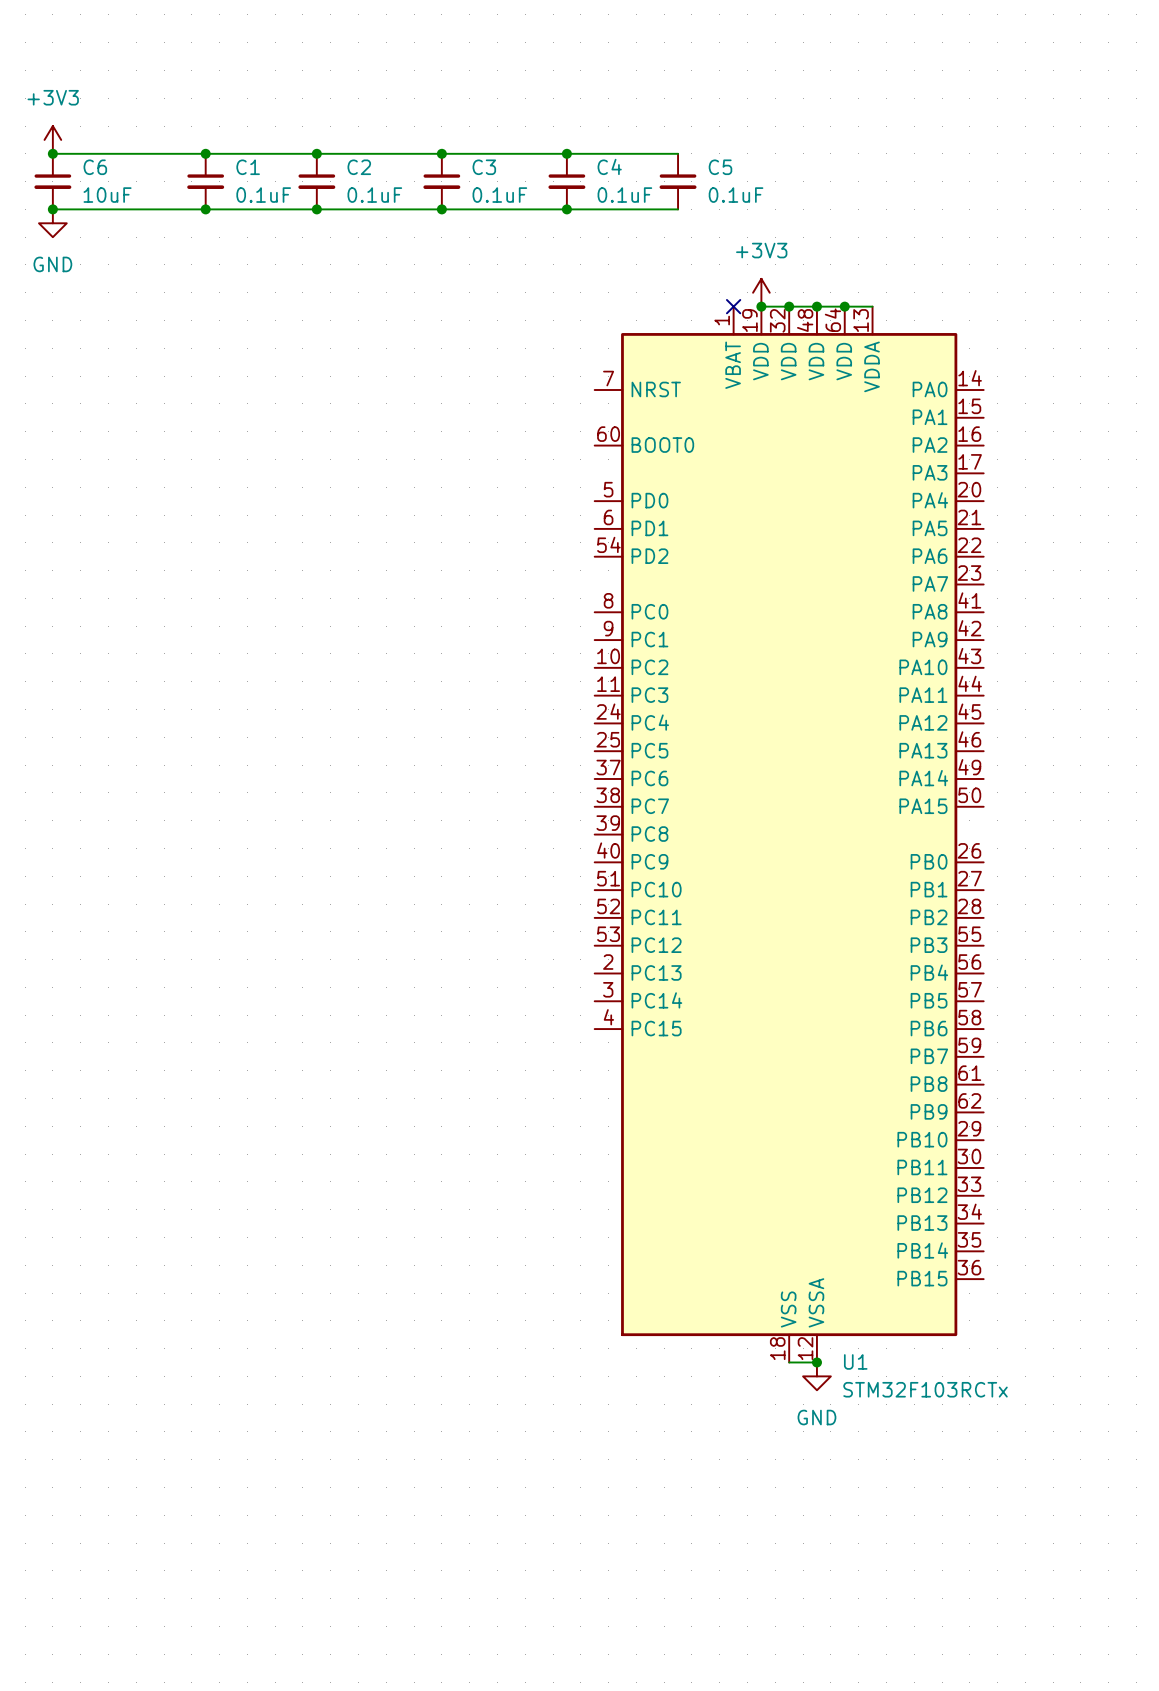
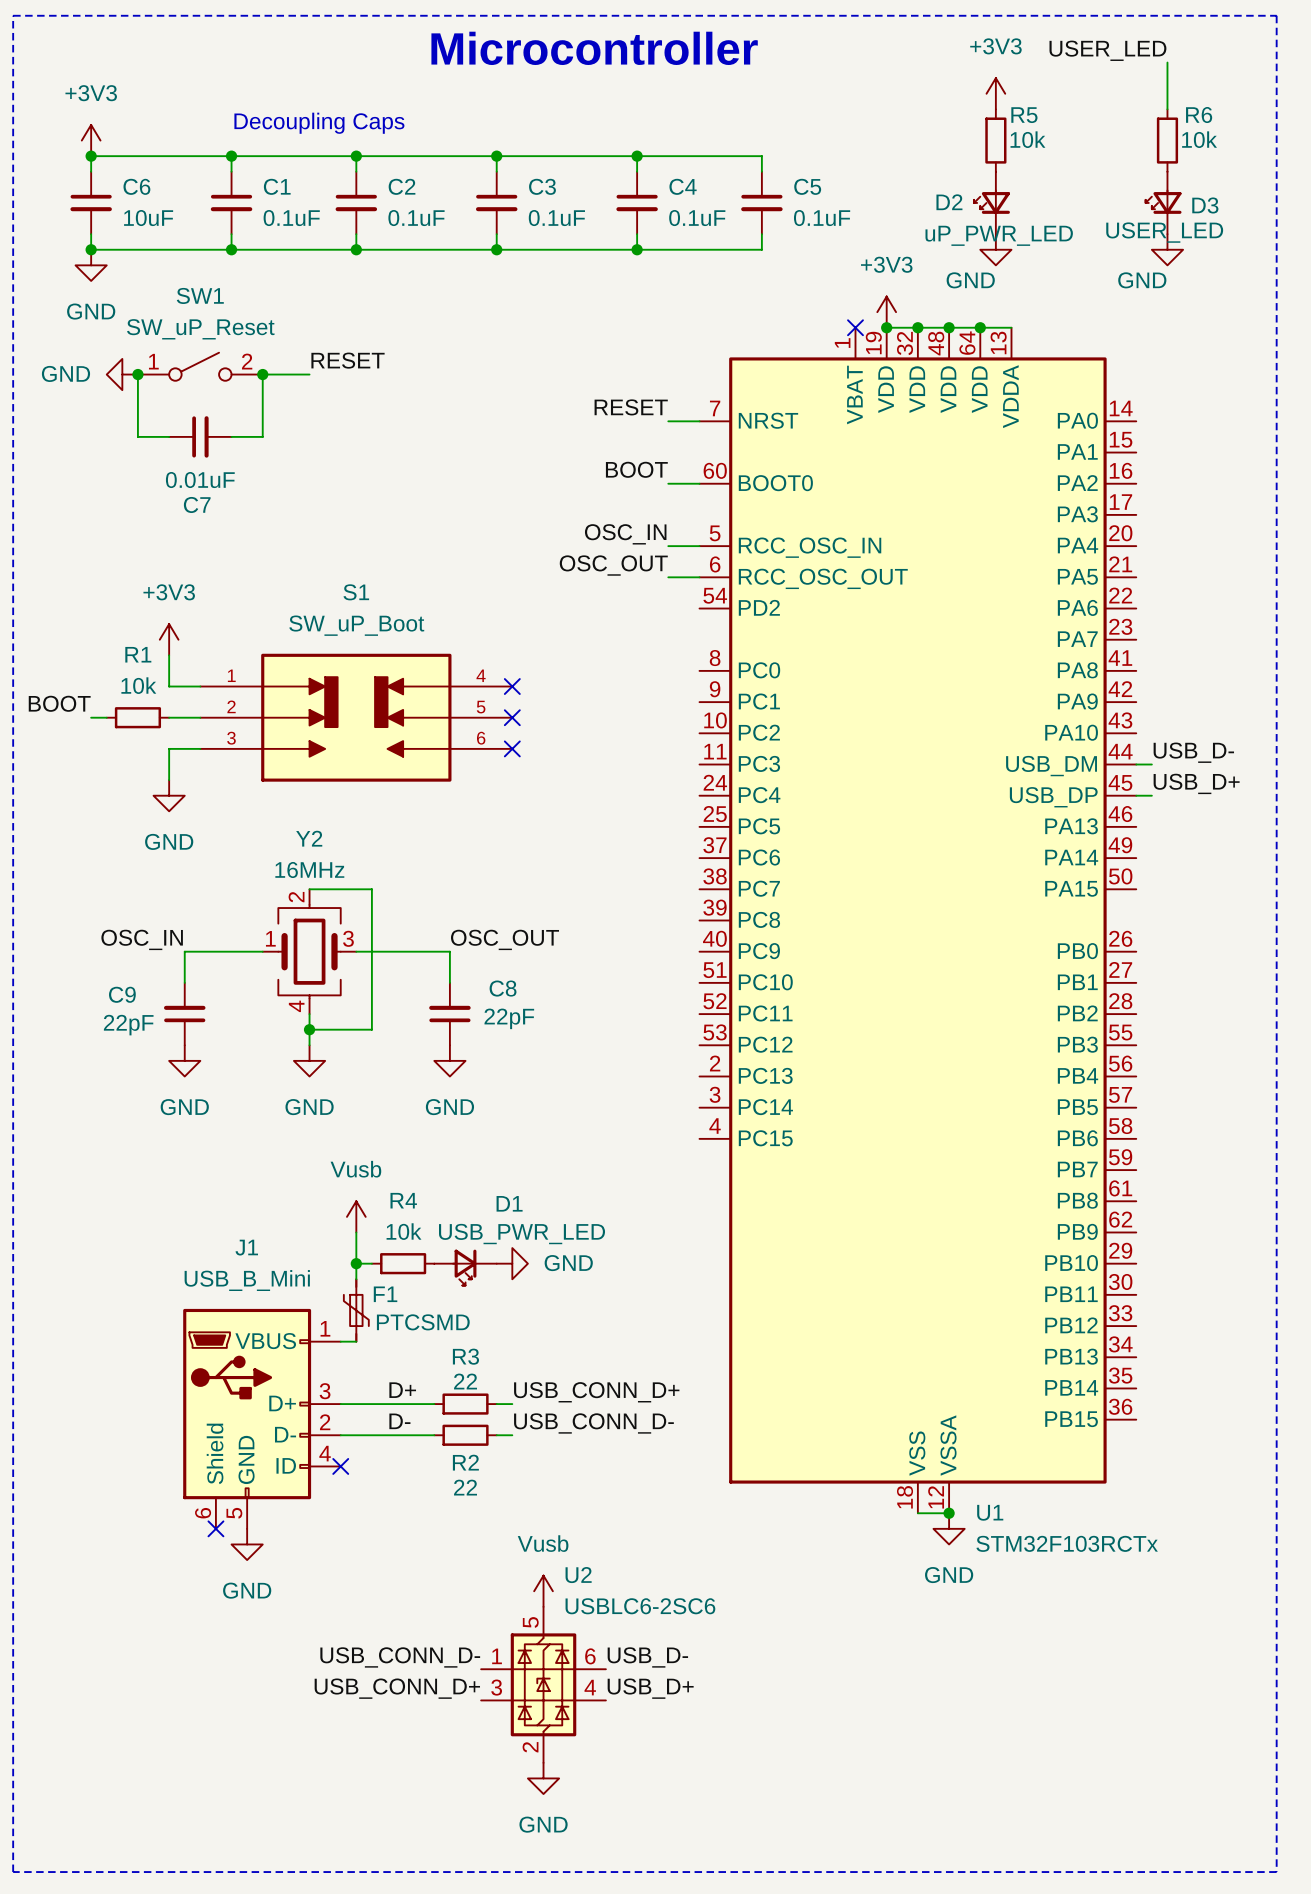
line: none -> (13, 15) (1276, 15) (1276, 1872) (13, 1872) (13, 15)
text: none -> Microcontroller (594, 48)
label: none -> USER_LED (1107, 50)
wire: none -> (1167, 62) (1167, 109)
power symbol: none -> +3V3 (995, 93)
text: none -> Decoupling Caps (319, 123)
R5: none -> 10k (995, 140)
R6: none -> 10k (1167, 140)
power symbol position: +3V3 (52, 139) -> +3V3 (91, 140)
wire: none -> (231, 156) (231, 171)
wire: none -> (356, 156) (356, 171)
wire: none -> (496, 156) (496, 171)
wire: none -> (637, 156) (637, 171)
wire: (52, 153) (678, 153) -> (91, 171) (91, 156) (761, 156) (761, 171)
junction position: (52, 153) -> (91, 156)
junction position: (205, 153) -> (231, 156)
junction position: (316, 153) -> (356, 156)
junction position: (441, 153) -> (496, 156)
junction position: (566, 153) -> (637, 156)
C6 position: (52, 181) -> (91, 202)
D2: none -> uP_PWR_LED (991, 202)
D3: none -> USER_LED (1163, 202)
wire: (52, 209) (678, 209) -> (91, 234) (91, 249) (761, 249) (761, 234)
junction position: (52, 209) -> (91, 249)
wire: none -> (231, 234) (231, 249)
junction position: (205, 209) -> (231, 249)
wire: none -> (356, 234) (356, 249)
junction position: (316, 209) -> (356, 249)
wire: none -> (496, 234) (496, 249)
junction position: (441, 209) -> (496, 249)
wire: none -> (637, 234) (637, 249)
junction position: (566, 209) -> (637, 249)
power symbol position: GND (52, 223) -> GND (91, 265)
power symbol: none -> GND (995, 249)
power symbol: none -> GND (1167, 249)
power symbol position: +3V3 (761, 292) -> +3V3 (886, 312)
junction: none -> (980, 327)
no-connect mark position: (733, 306) -> (855, 327)
wire: (761, 306) (872, 306) -> (886, 327) (1011, 327)
junction: (761, 306) -> none
junction position: (789, 306) -> (886, 327)
junction position: (816, 306) -> (917, 327)
junction position: (844, 306) -> (949, 327)
label: none -> RESET (348, 360)
SW1: none -> SW_uP_Reset (200, 366)
power symbol: none -> GND (122, 374)
wire: none -> (137, 374) (137, 436) (169, 436)
junction: none -> (137, 374)
junction: none -> (262, 374)
wire: none -> (309, 374) (262, 374) (262, 436) (231, 436)
label: none -> RESET (631, 407)
wire: none -> (668, 421) (699, 421)
C7: none -> 0.01uF (200, 436)
label: none -> BOOT (636, 469)
wire: none -> (668, 483) (699, 483)
label: none -> OSC_IN (625, 534)
wire: none -> (668, 546) (699, 546)
U1 pin name: PD0 (649, 500) -> RCC_OSC_IN (810, 547)
label: none -> OSC_OUT (613, 565)
wire: none -> (668, 577) (699, 577)
U1 pin name: PD1 (649, 528) -> RCC_OSC_OUT (823, 578)
power symbol: none -> +3V3 (169, 639)
wire: none -> (169, 655) (169, 686) (200, 686)
no-connect mark: none -> (512, 686)
label: none -> BOOT (59, 703)
wire: none -> (91, 717) (106, 717)
R1: none -> 10k (137, 717)
wire: none -> (169, 717) (200, 717)
S1: none -> SW_uP_Boot (356, 717)
no-connect mark: none -> (512, 717)
wire: none -> (200, 748) (169, 748) (169, 780)
no-connect mark: none -> (512, 748)
label: none -> USB_D- (1193, 752)
wire: none -> (1136, 764) (1151, 764)
U1 pin name: PA11 (923, 695) -> USB_DM (1051, 766)
label: none -> USB_D+ (1196, 783)
power symbol: none -> GND (169, 795)
wire: none -> (1136, 795) (1151, 795)
U1 pin name: PA12 (923, 722) -> USB_DP (1053, 797)
wire: none -> (309, 889) (371, 889) (371, 1029) (309, 1029)
U1 position: (789, 834) -> (917, 920)
label: none -> OSC_IN (142, 939)
label: none -> OSC_OUT (505, 939)
wire: none -> (262, 951) (184, 951) (184, 982)
Y2: none -> 16MHz (309, 951)
wire: none -> (356, 951) (449, 951) (449, 982)
C9: none -> 22pF (184, 1014)
wire: none -> (309, 1014) (309, 1045)
C8: none -> 22pF (449, 1014)
junction: none -> (309, 1029)
power symbol: none -> GND (184, 1060)
power symbol: none -> GND (309, 1060)
power symbol: none -> GND (449, 1060)
power symbol: none -> Vusb (356, 1216)
wire: none -> (356, 1232) (356, 1279)
wire: none -> (356, 1263) (371, 1263)
junction: none -> (356, 1263)
R4: none -> 10k (403, 1263)
power symbol: none -> GND (512, 1263)
D1: none -> USB_PWR_LED (465, 1267)
F1: none -> PTCSMD (356, 1310)
wire: none -> (340, 1341) (356, 1341)
label: none -> D+ (402, 1390)
label: none -> USB_CONN_D+ (596, 1392)
wire: none -> (340, 1404) (434, 1404)
R3: none -> 22 (465, 1404)
wire: none -> (496, 1404) (512, 1404)
J1: none -> USB_B_Mini (261, 1418)
label: none -> D- (399, 1421)
label: none -> USB_CONN_D- (593, 1423)
wire: none -> (340, 1435) (434, 1435)
R2: none -> 22 (465, 1435)
wire: none -> (496, 1435) (512, 1435)
no-connect mark: none -> (340, 1466)
no-connect mark: none -> (215, 1528)
wire: (789, 1362) (816, 1362) -> (917, 1513) (949, 1513)
junction position: (816, 1362) -> (949, 1513)
power symbol: none -> GND (247, 1544)
power symbol position: GND (816, 1376) -> GND (949, 1528)
power symbol: none -> Vusb (543, 1591)
label: none -> USB_CONN_D- (400, 1657)
label: none -> USB_D- (647, 1657)
U2: none -> USBLC6-2SC6 (543, 1684)
label: none -> USB_CONN_D+ (397, 1688)
label: none -> USB_D+ (650, 1688)
power symbol: none -> GND (543, 1778)

